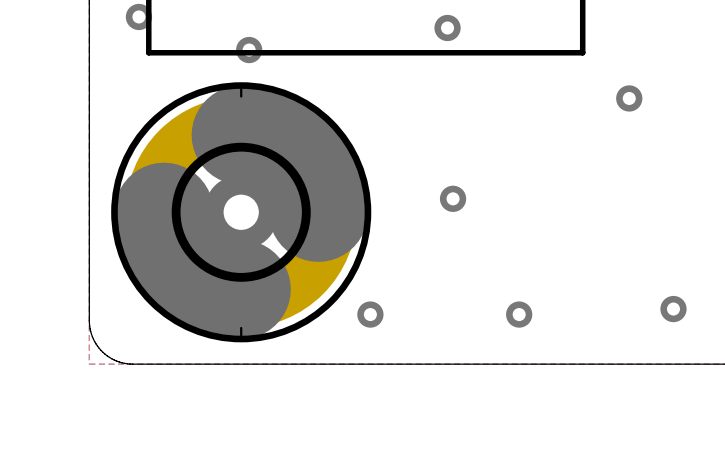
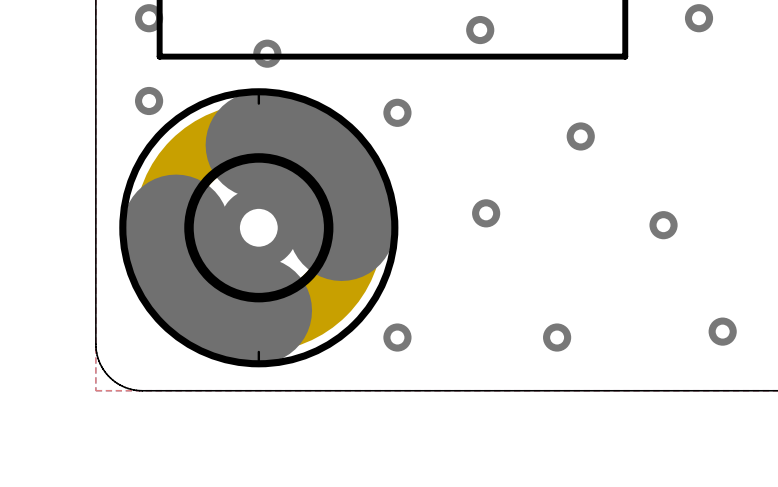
via: none -> (699, 18)
via: none -> (149, 100)
via: (629, 98) -> none
via: none -> (397, 112)
via: none -> (580, 136)
via: none -> (663, 225)

